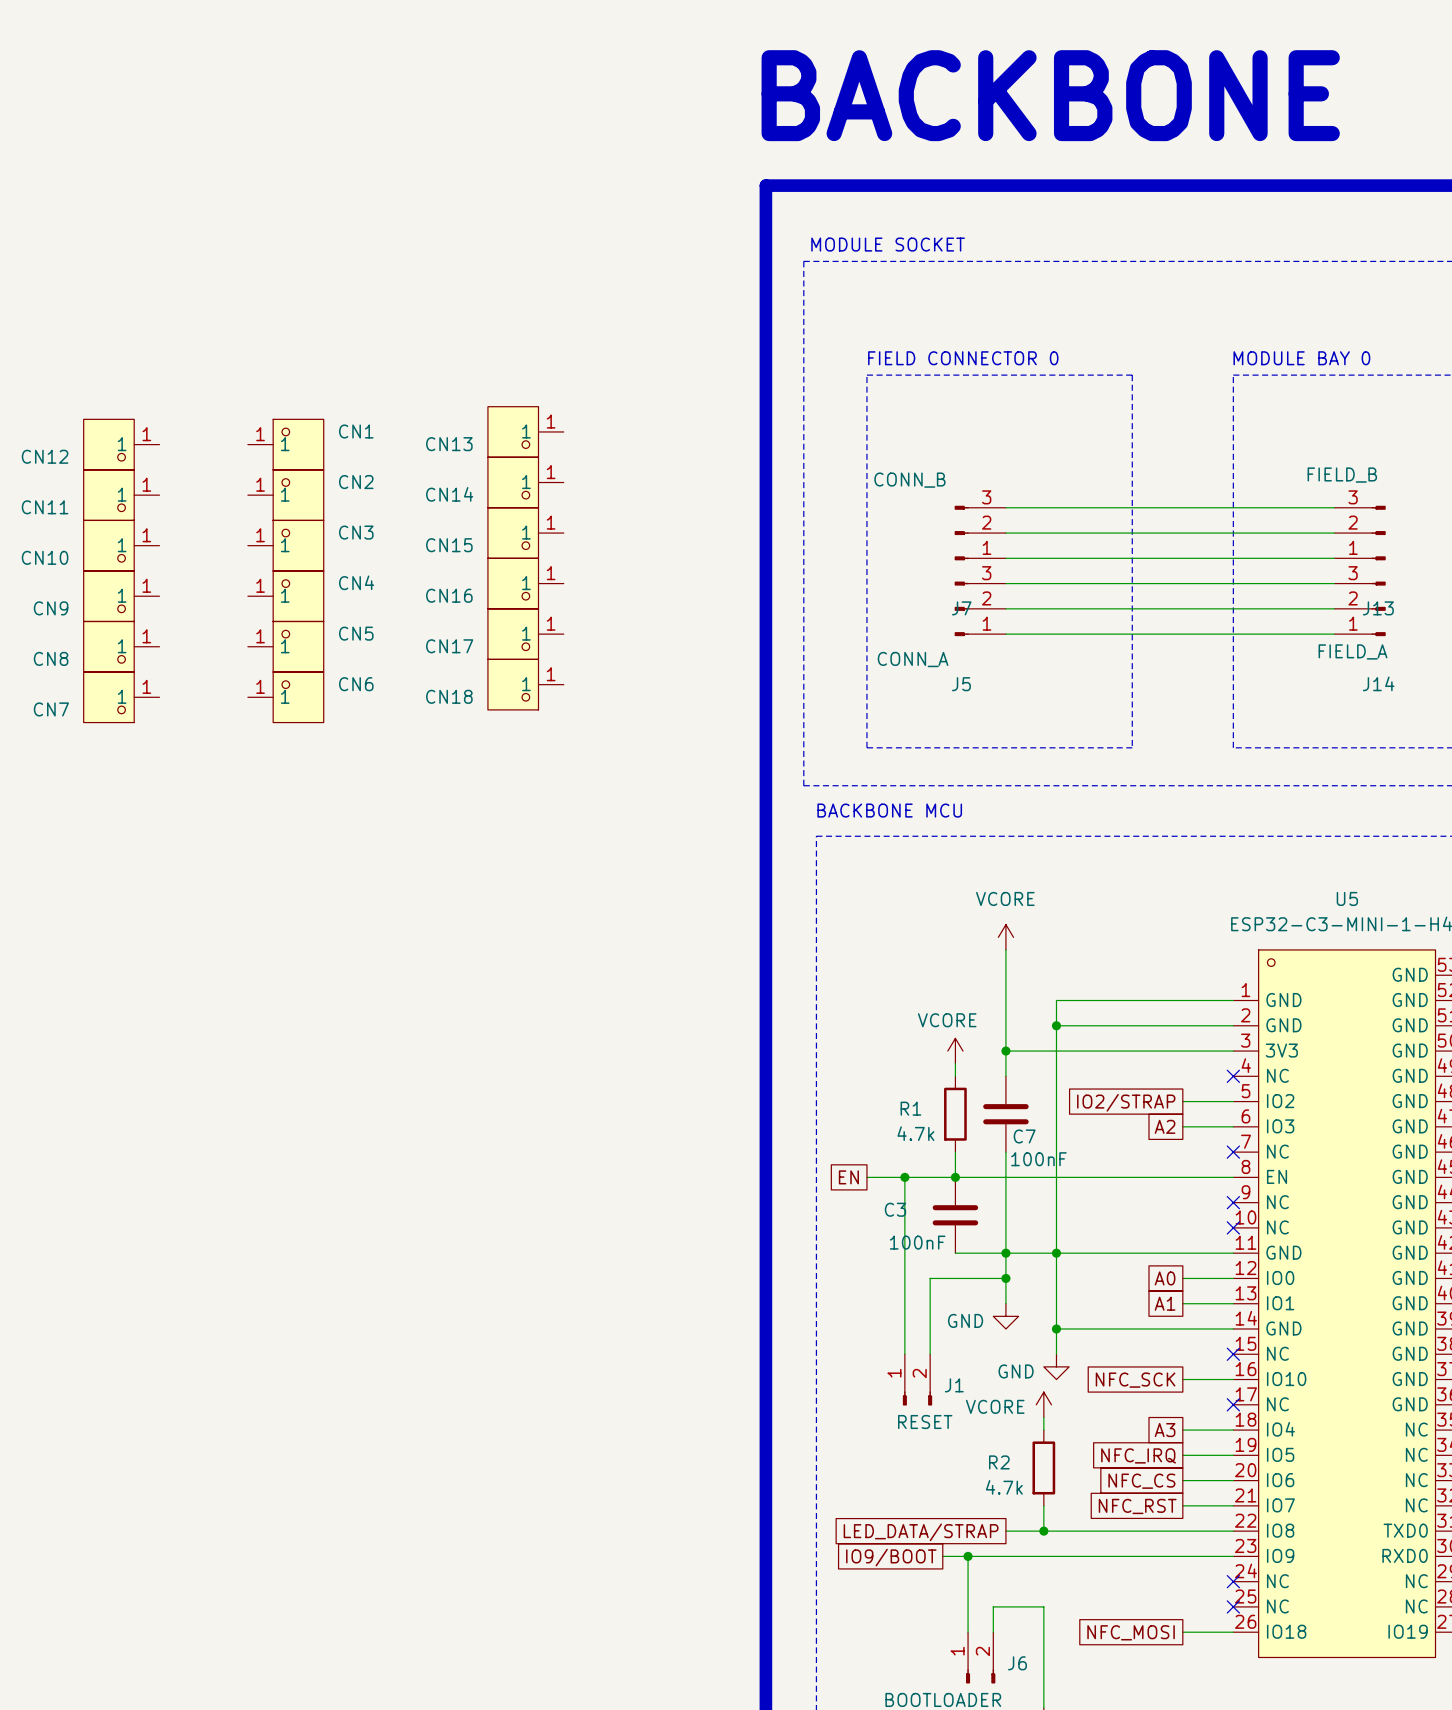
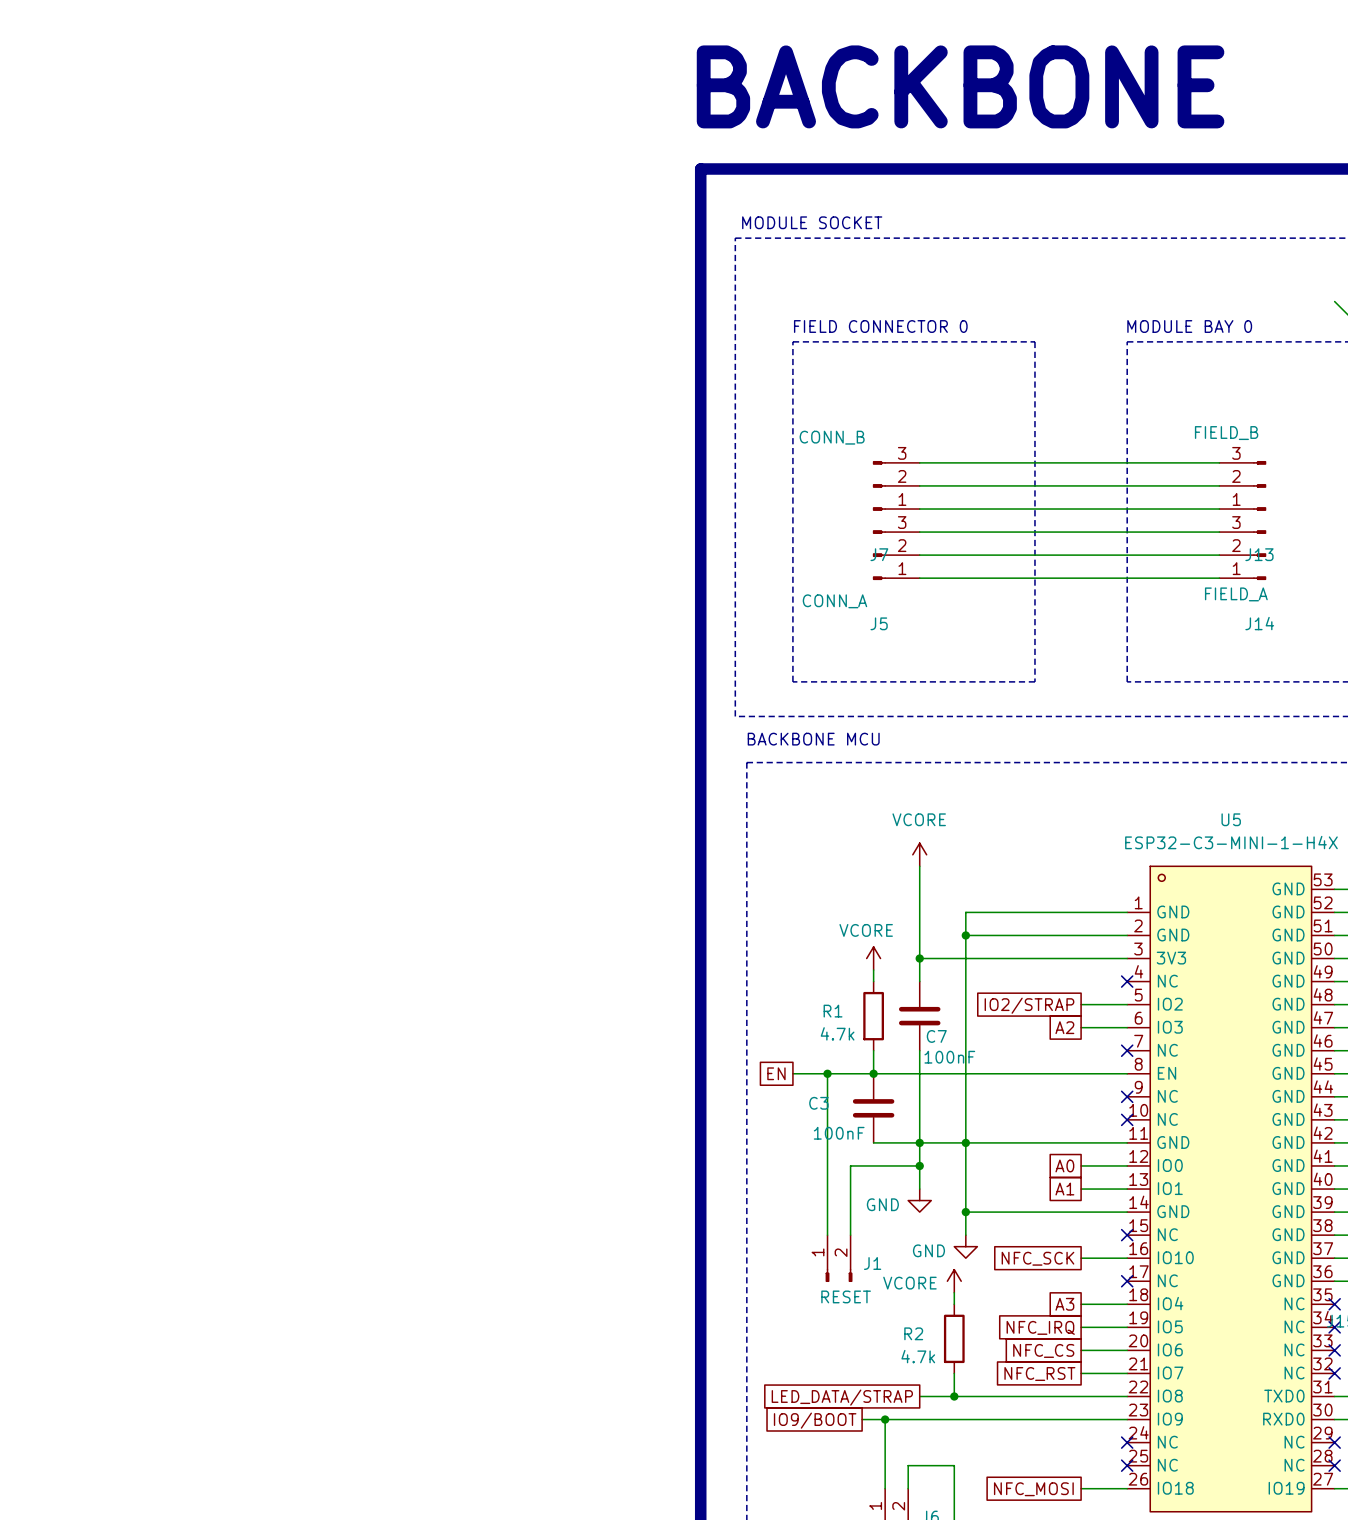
CN13: (525, 431) -> none
CN12: (121, 444) -> none
CN1: (285, 444) -> none
CN14: (525, 482) -> none
CN11: (121, 495) -> none
CN2: (285, 495) -> none
CN15: (525, 533) -> none
CN10: (121, 545) -> none
CN3: (285, 545) -> none
CN16: (525, 583) -> none
CN9: (121, 596) -> none
CN4: (285, 596) -> none
CN17: (525, 634) -> none
CN8: (121, 646) -> none
CN5: (285, 646) -> none
CN18: (525, 684) -> none
CN7: (121, 697) -> none
CN6: (285, 697) -> none

